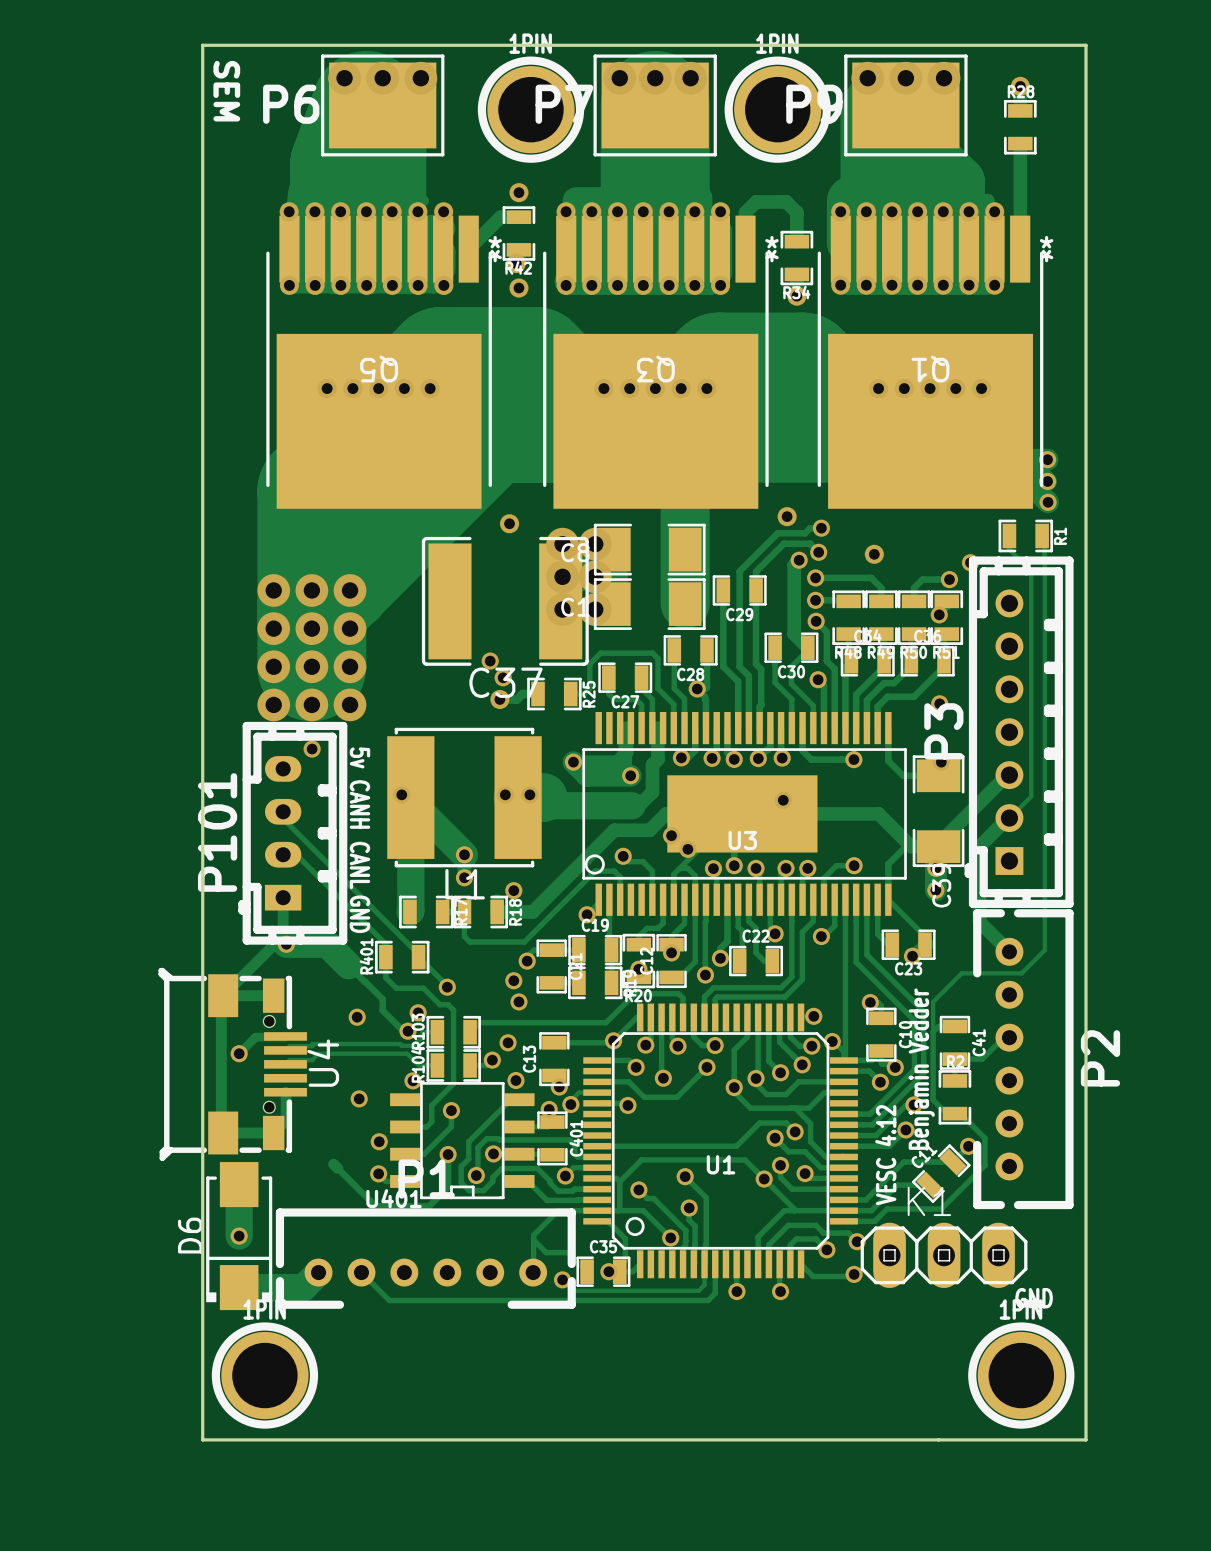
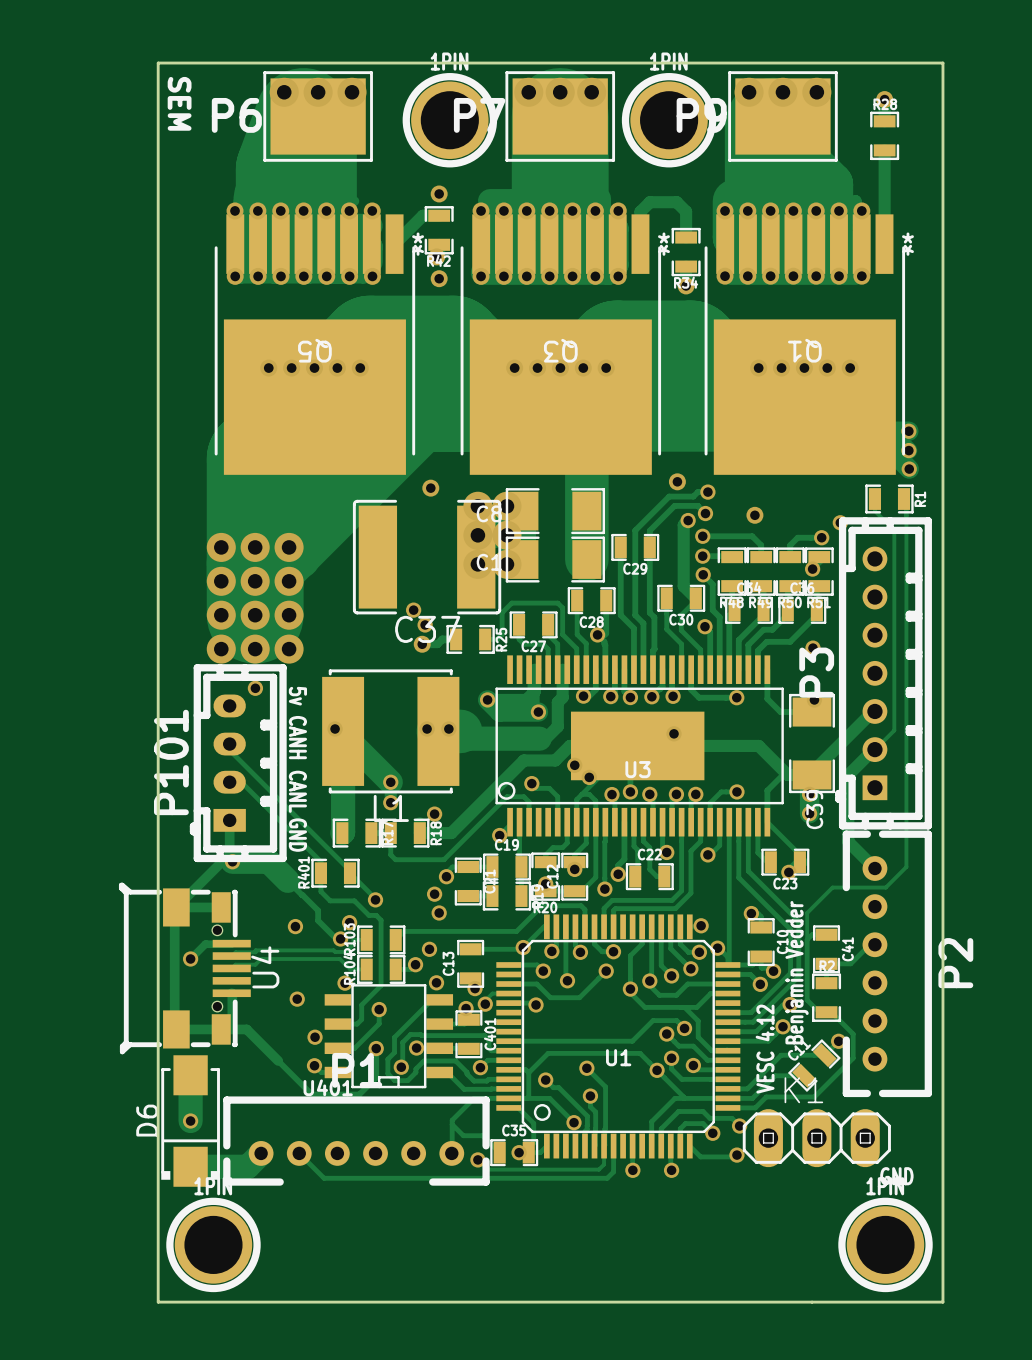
track: none -> (221, 1029) (246, 1029) (274, 1057)

